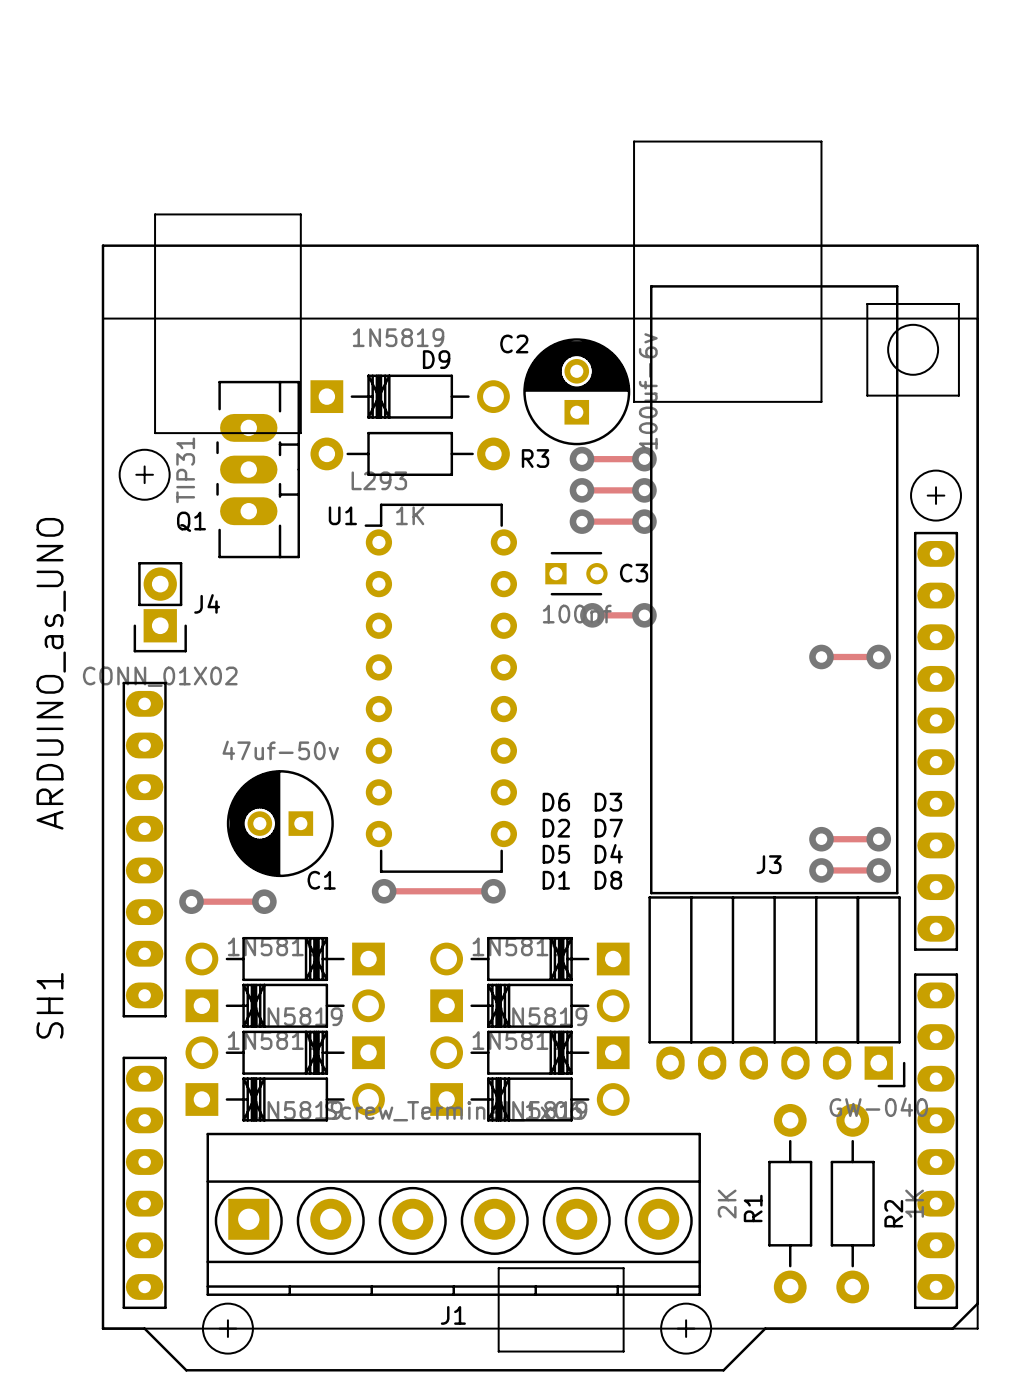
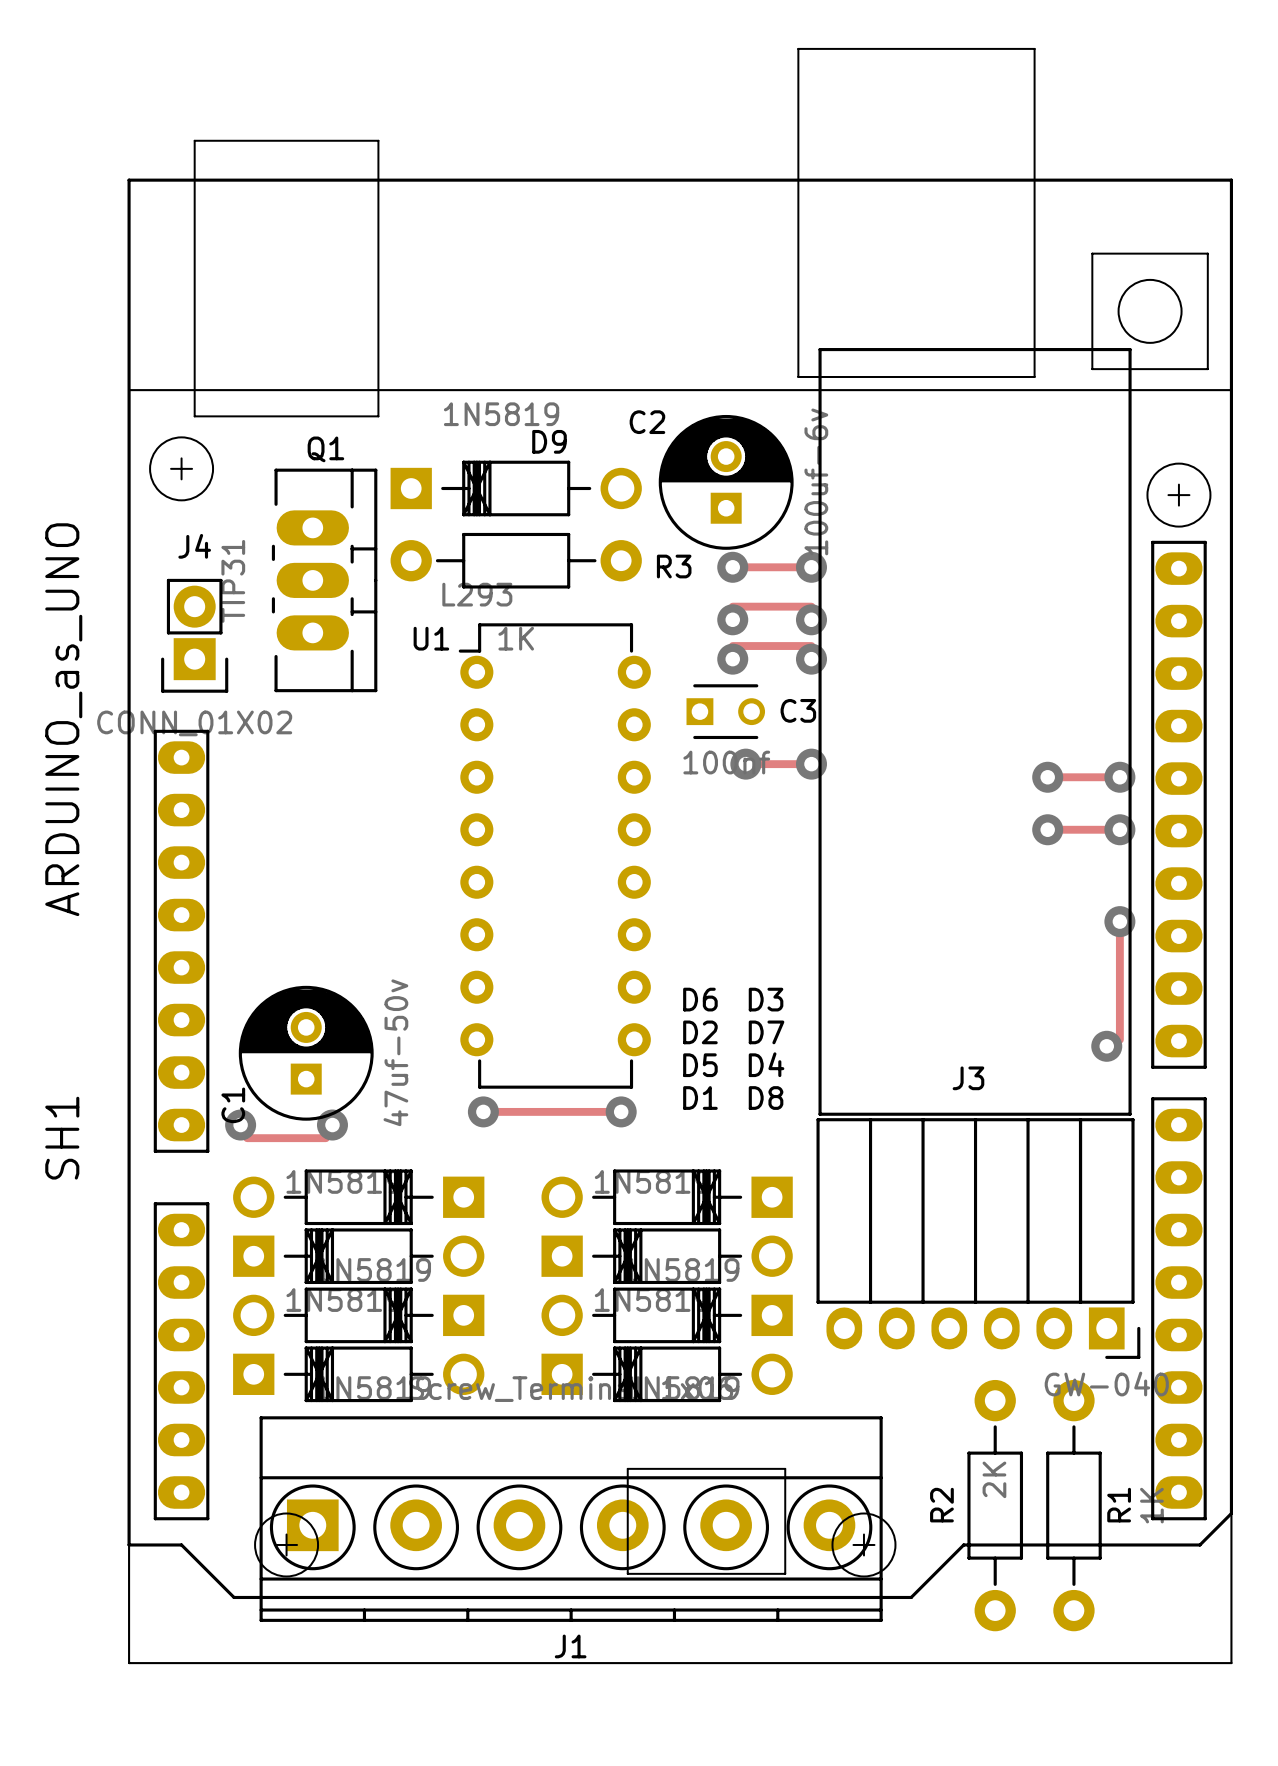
via: (581, 490) -> none
via: (644, 490) -> none
via: none -> (732, 619)
via: none -> (811, 619)
Q1 name position: Q1 (191, 521) -> Q1 (325, 449)
via: (581, 521) -> none
via: (644, 521) -> none
via: none -> (732, 659)
via: none -> (811, 659)
J4 name position: J4 (207, 603) -> J4 (194, 546)
J4 position: (160, 607) -> (194, 635)
via: none -> (1047, 777)
via: none -> (1119, 777)
track: (821, 656) (878, 656) -> (1047, 829) (1119, 829)
via position: (821, 656) -> (1047, 829)
via position: (878, 656) -> (1119, 829)
track: none -> (1119, 921) (1119, 1039)
via: none -> (1119, 921)
SH1 position: (540, 756) -> (680, 823)
C1 rotation: 0° (280, 823) -> 90° clockwise (306, 1053)
track: (821, 839) (878, 839) -> (1047, 777) (1119, 777)
via: (821, 839) -> none
track: (821, 870) (878, 870) -> none
via: (821, 870) -> none
via: (878, 870) -> none
track: (191, 901) (264, 901) -> none
track: none -> (247, 1138) (325, 1138)
R2 value position: 2K (727, 1204) -> 2K (994, 1479)
R1 name position: R1 (753, 1208) -> R1 (1119, 1505)
R2 name position: R2 (893, 1213) -> R2 (941, 1505)

